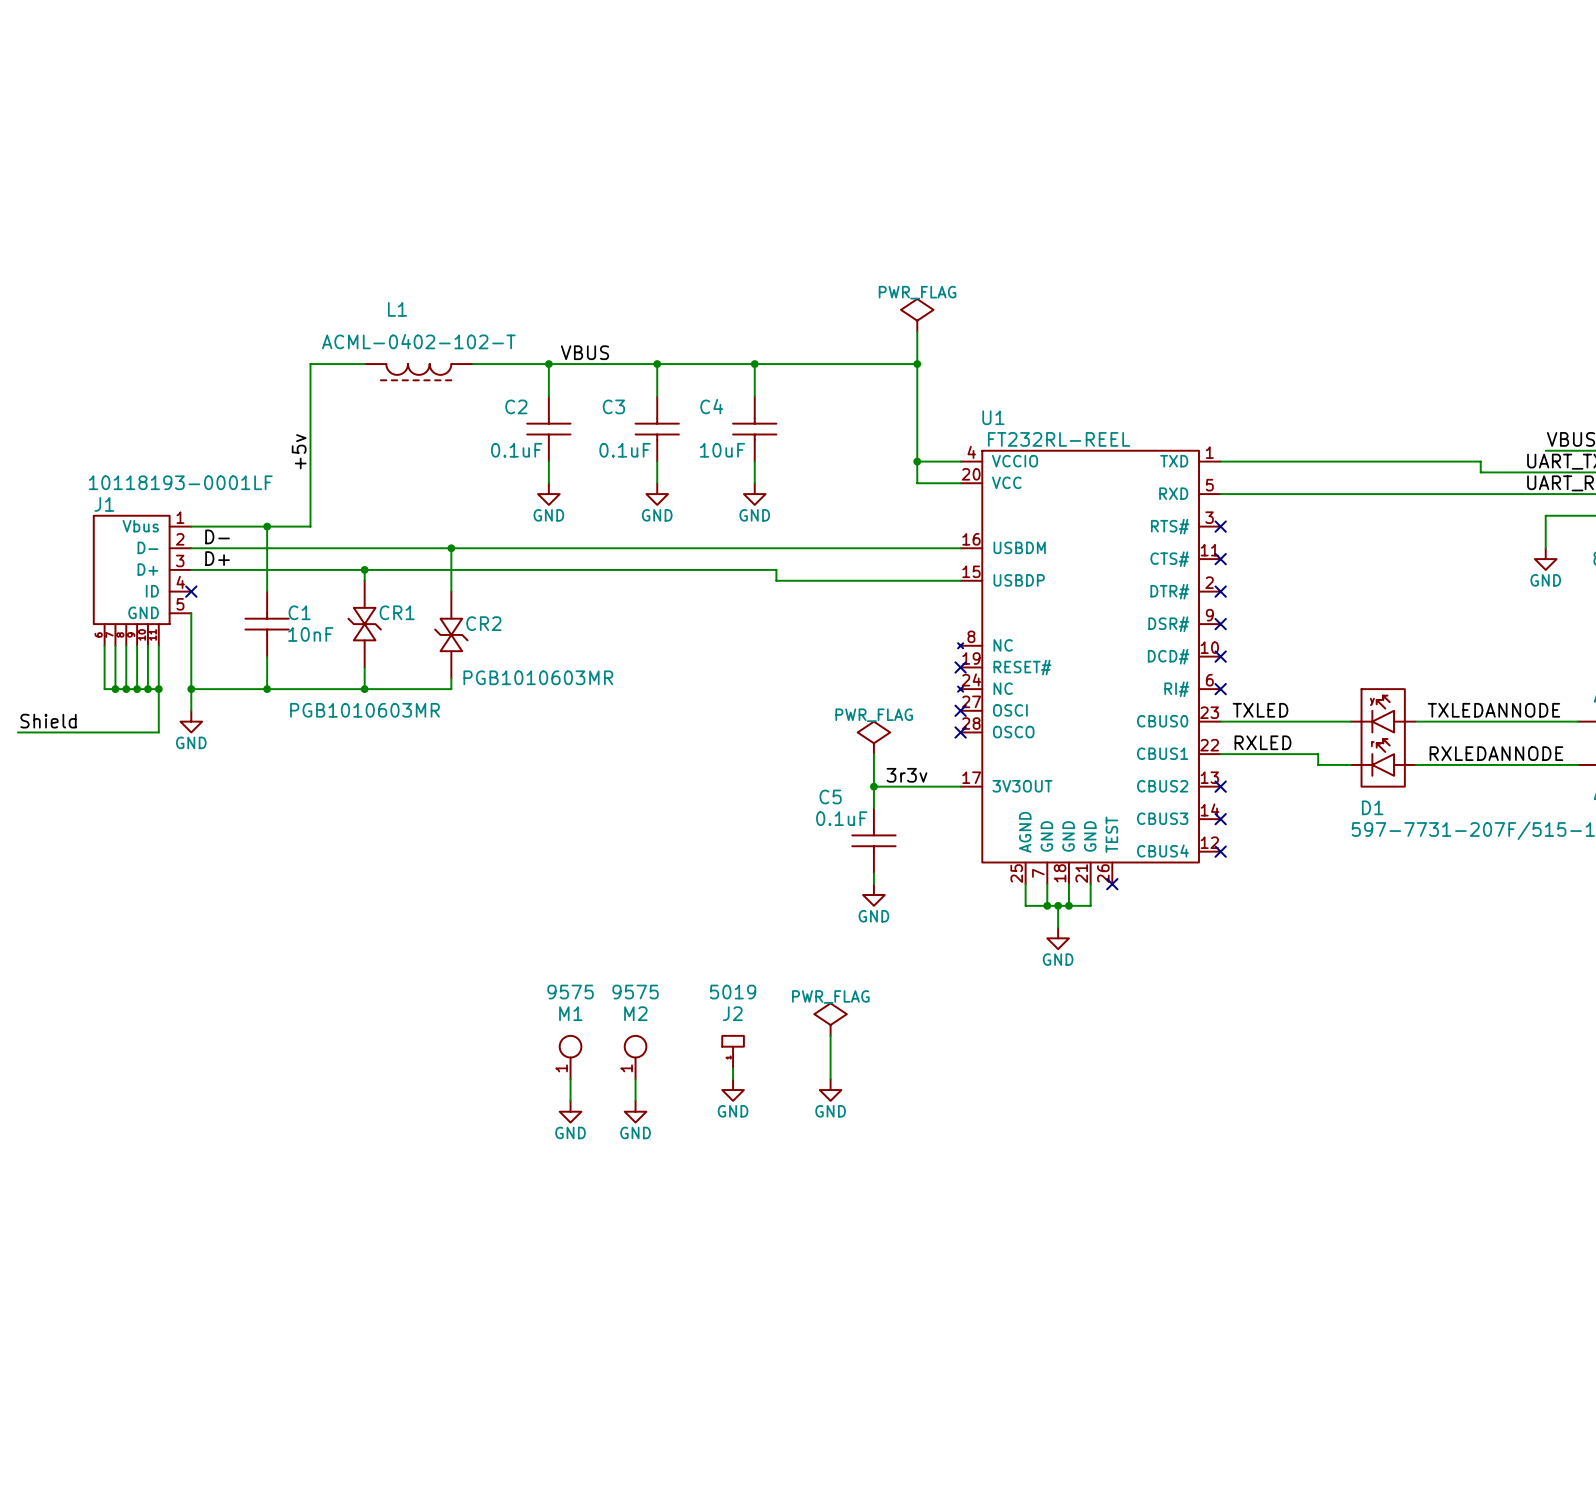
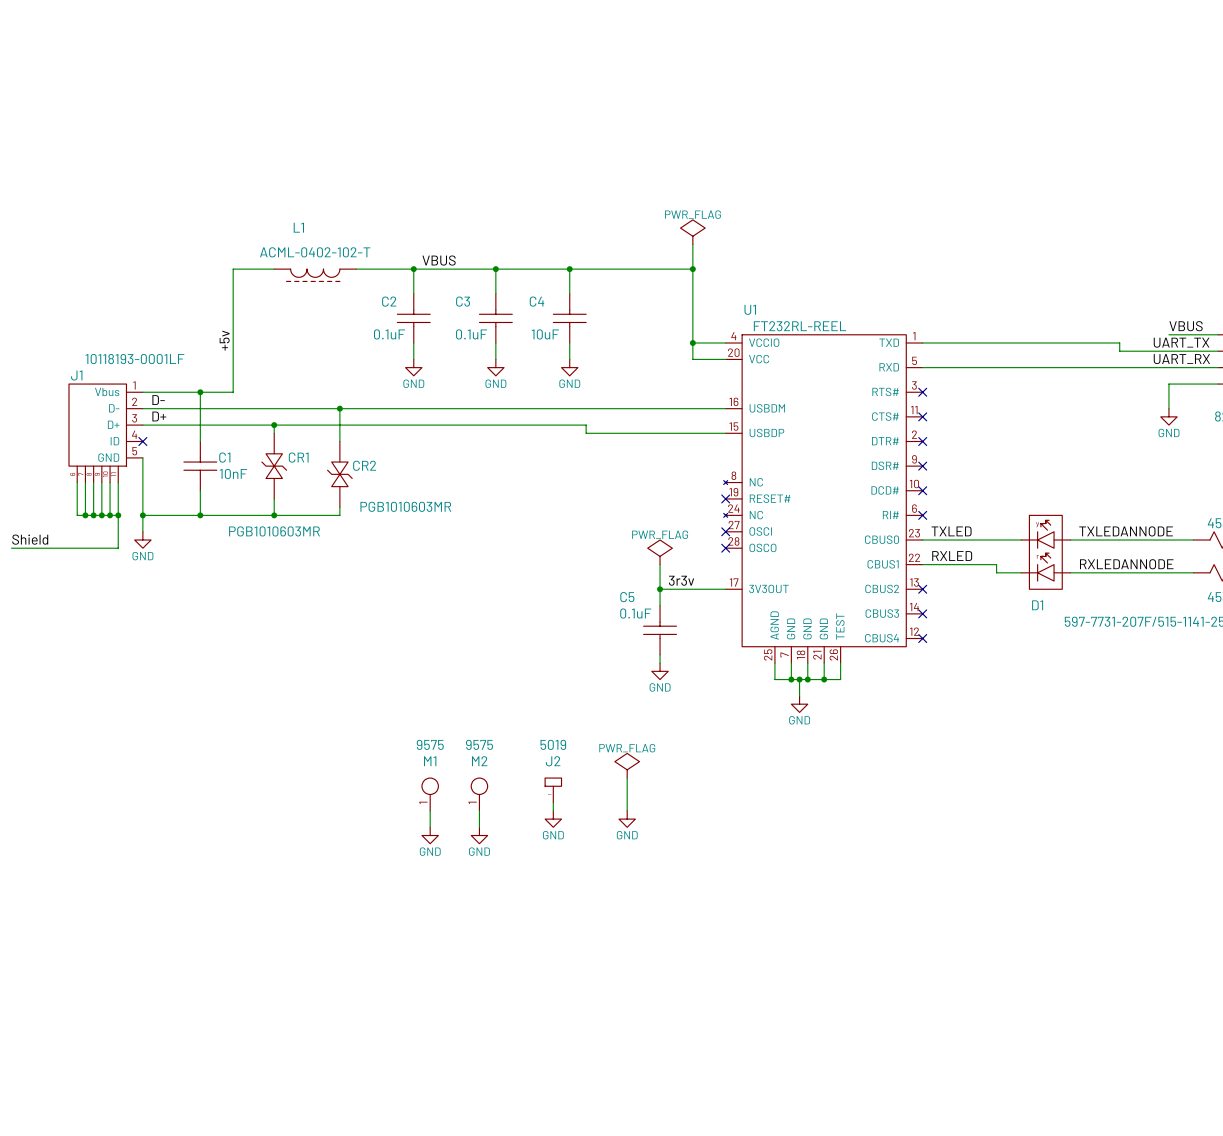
wire: none -> (840, 663) (840, 679) (824, 679)
no-connect mark: (1112, 884) -> none
junction: none -> (824, 679)

